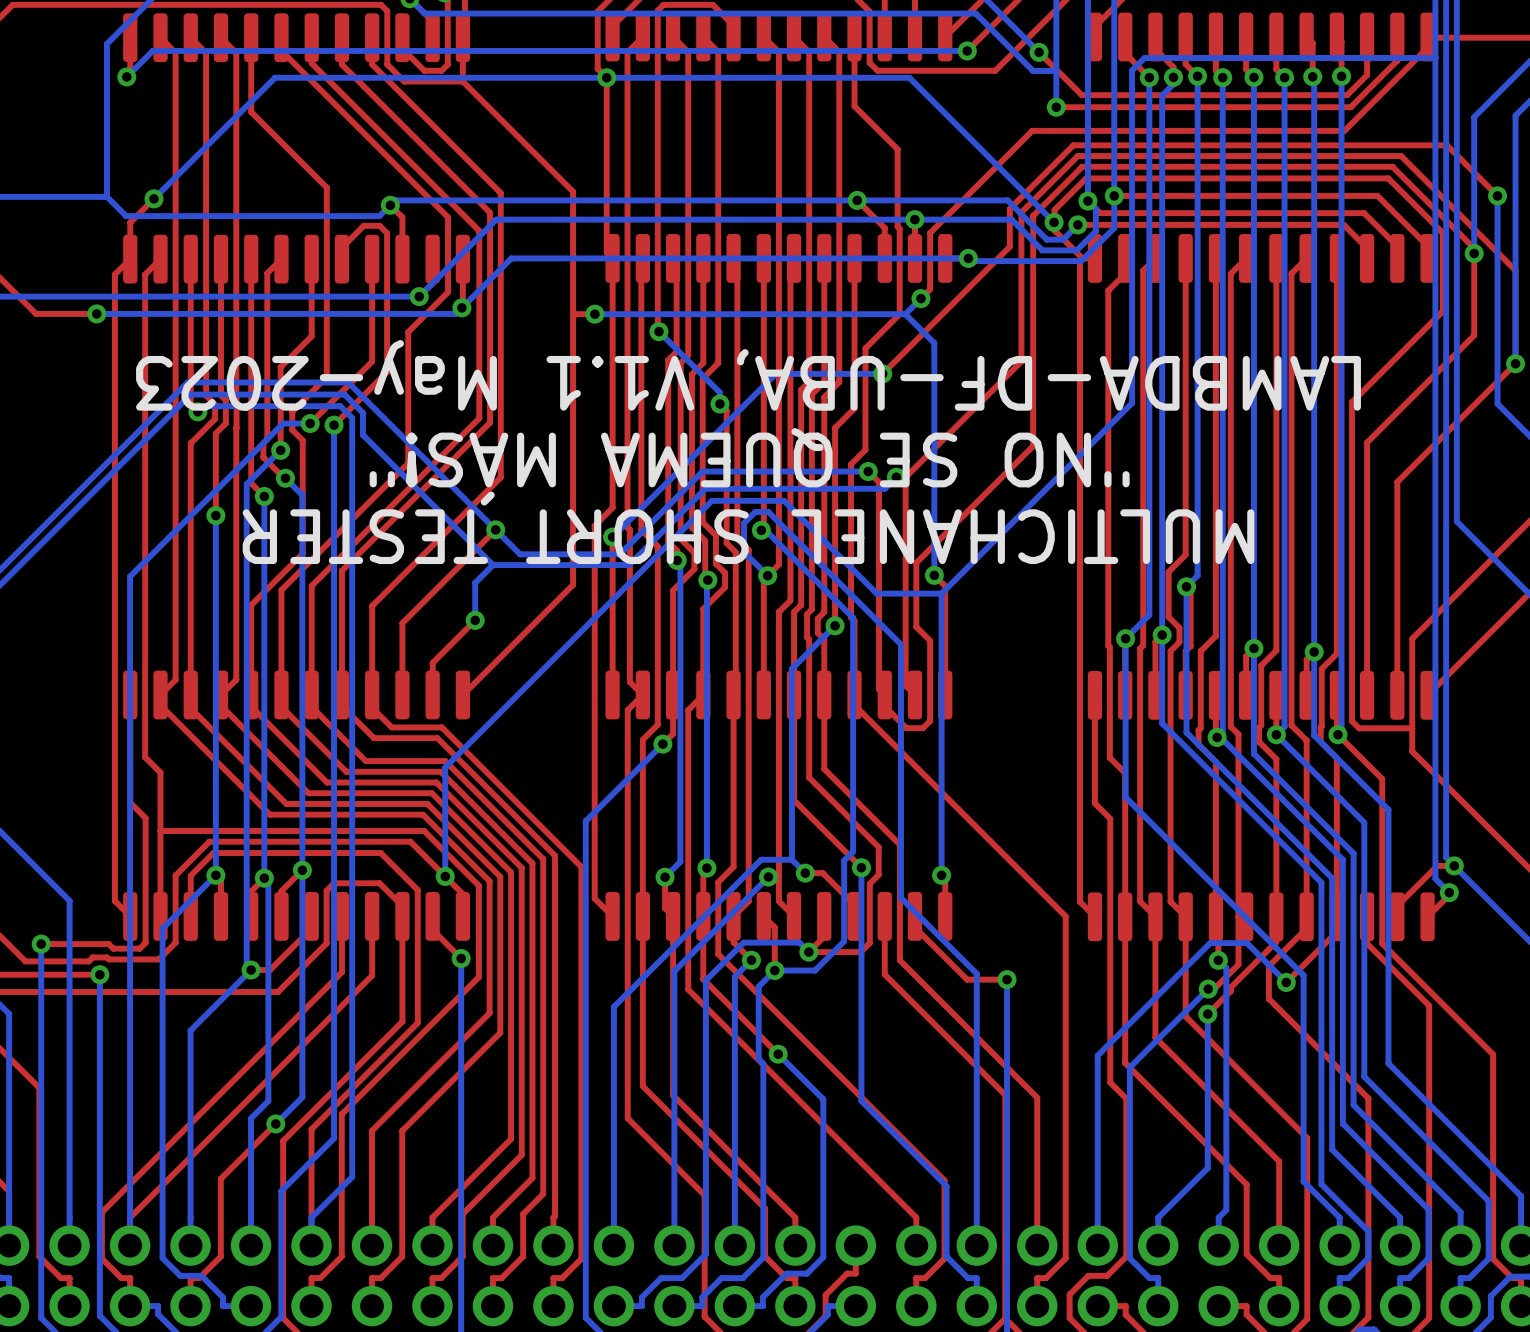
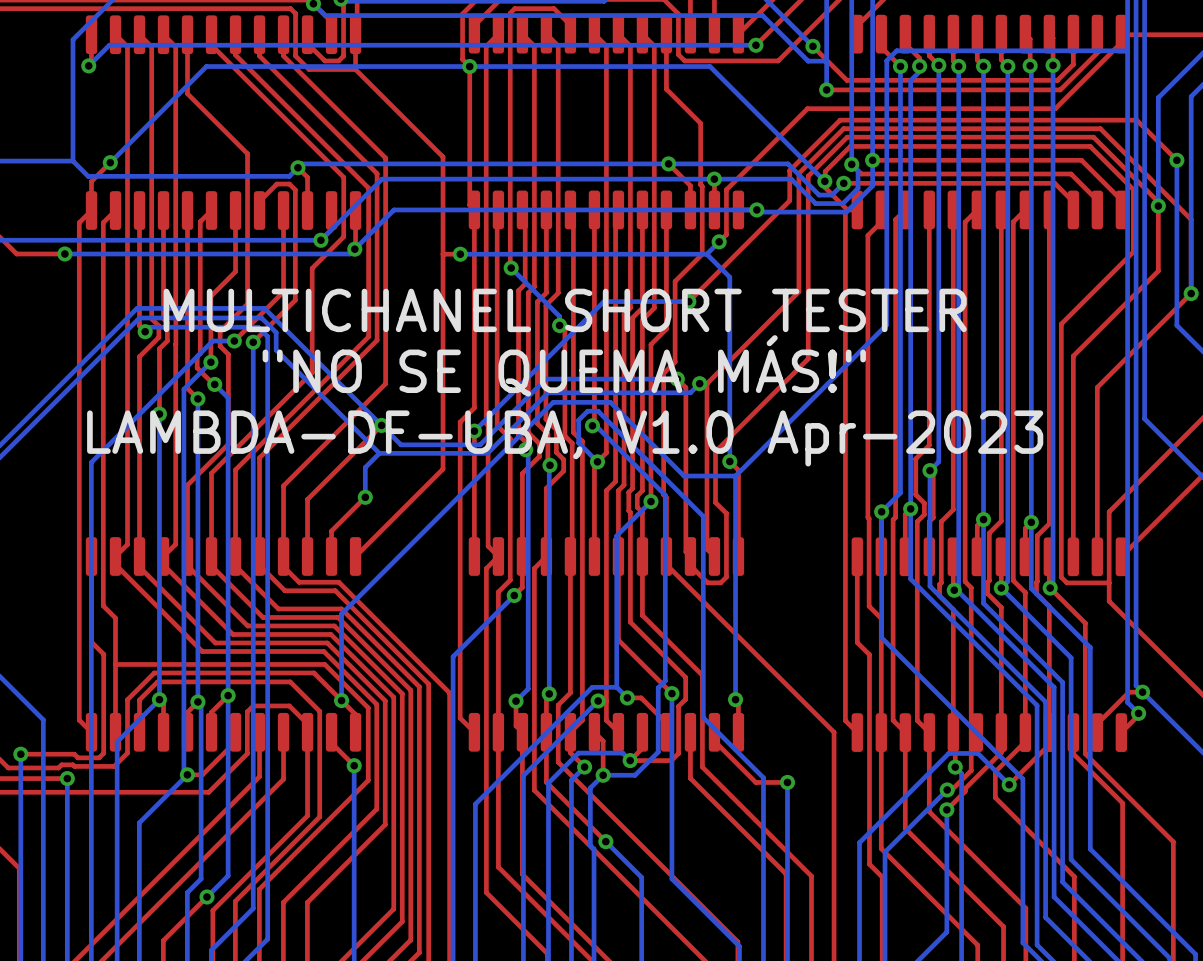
text: LAMBDA-DF-UBA, V1.1 May-2023 (748, 375) -> none
text rotation: 0° (749, 466) -> 180° (564, 365)
text rotation: 0° (748, 536) -> 180° (565, 310)
text: none -> LAMBDA-DF-UBA, V1.0 Apr-2023 (565, 438)

